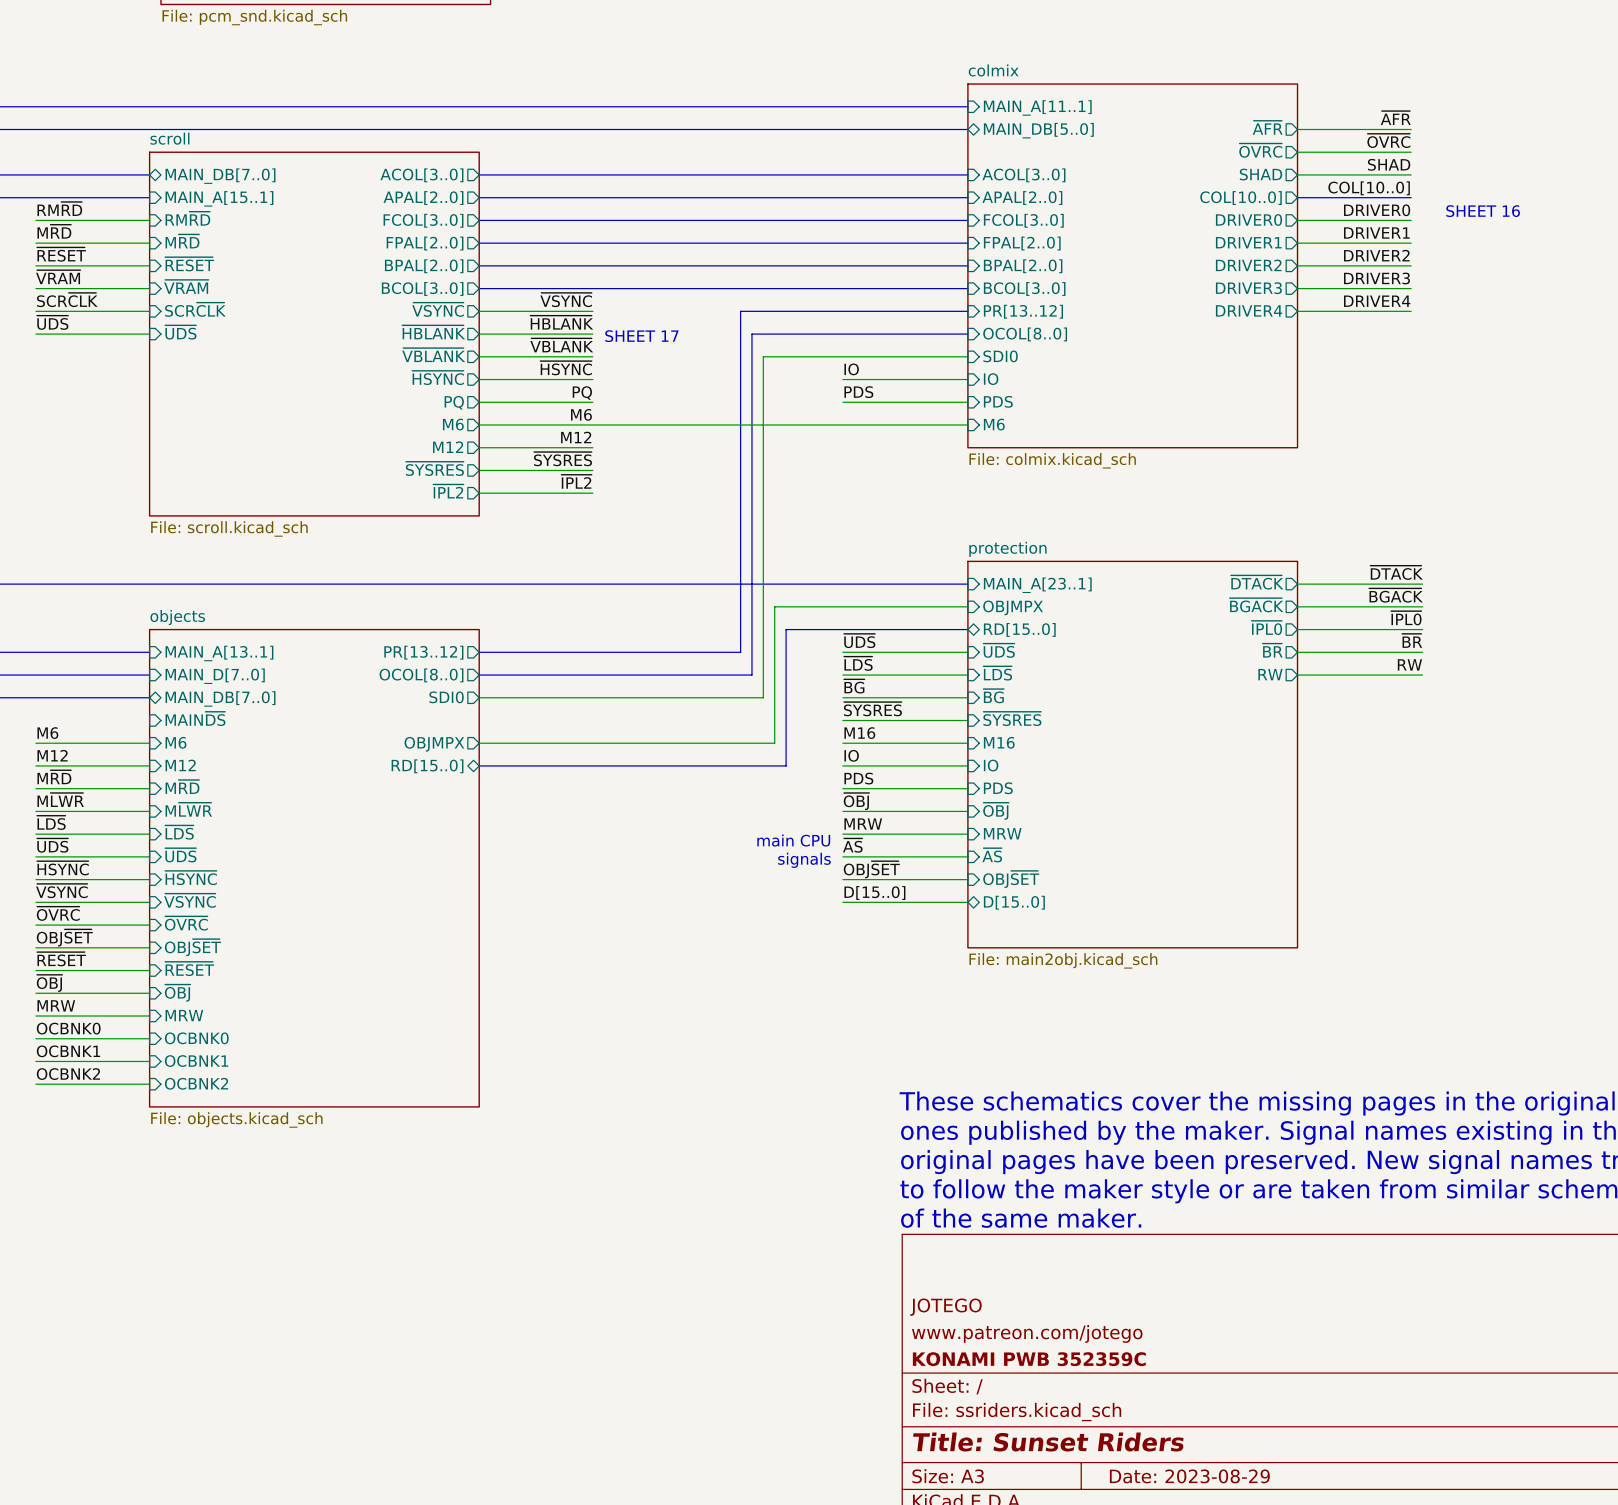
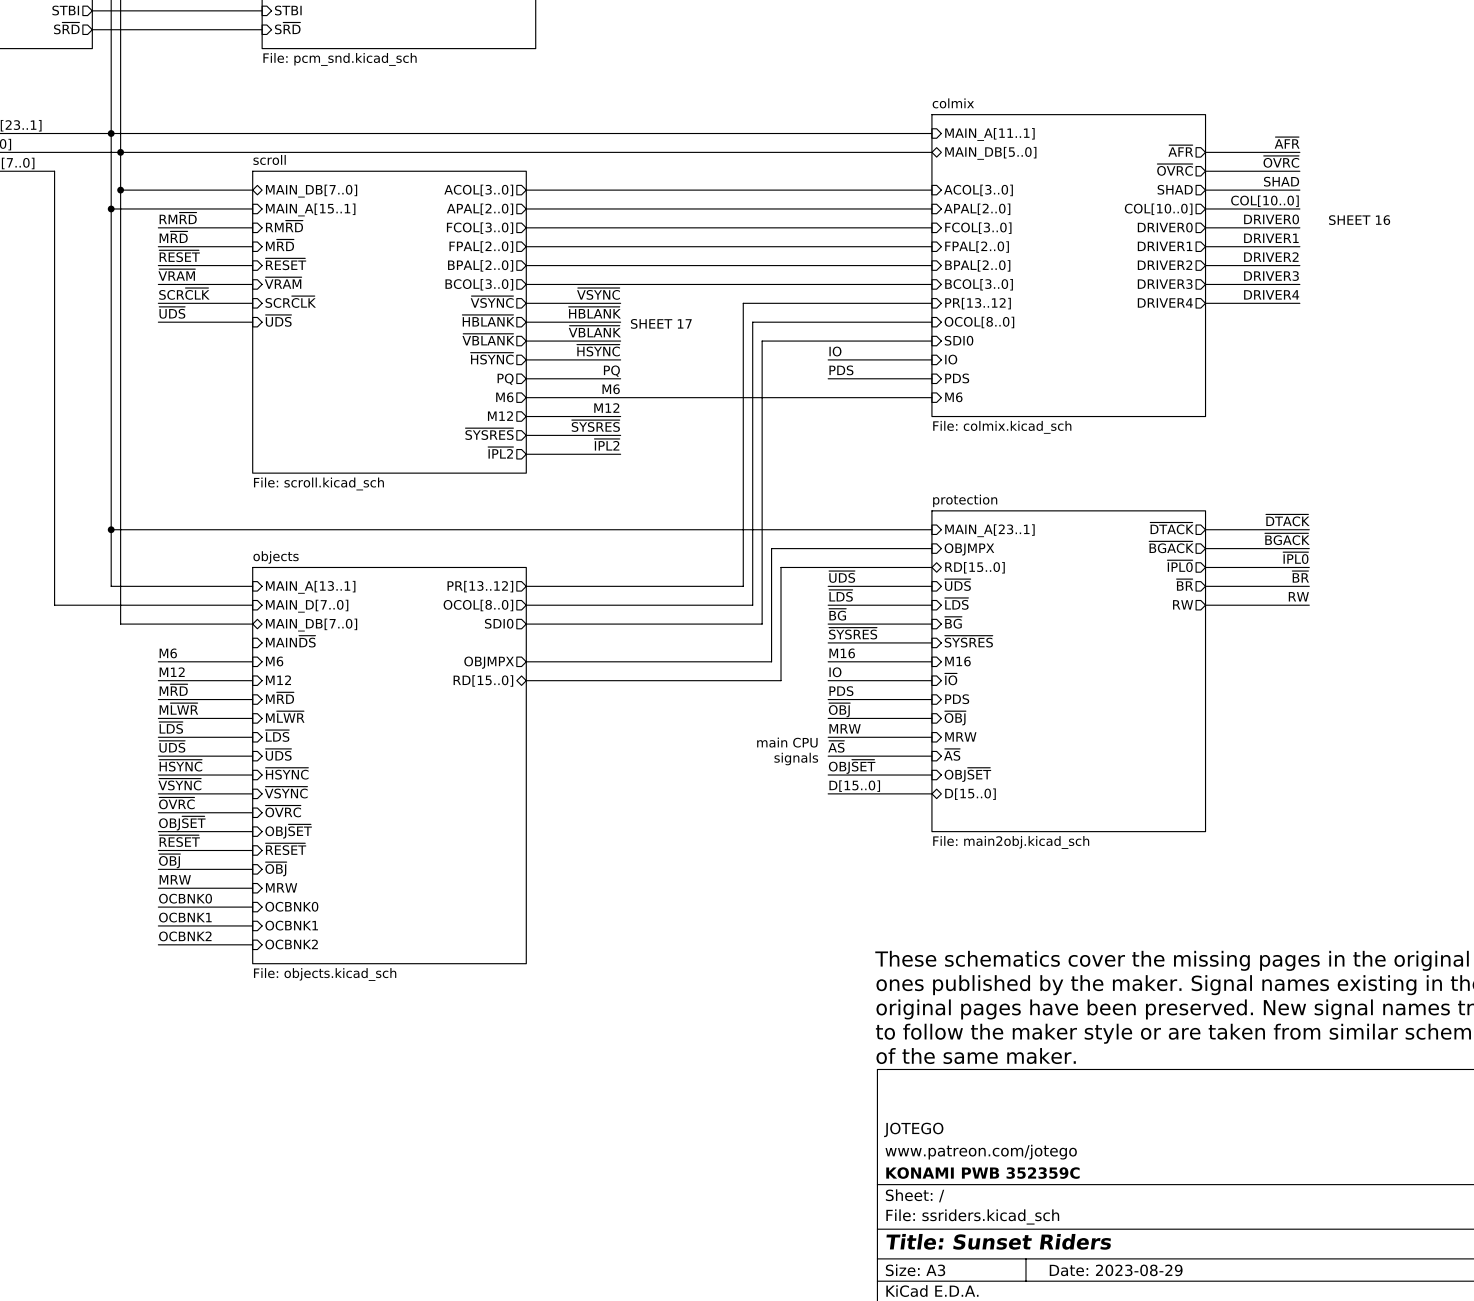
sheet pin: IO (991, 765) -> ~{IO} (951, 679)

